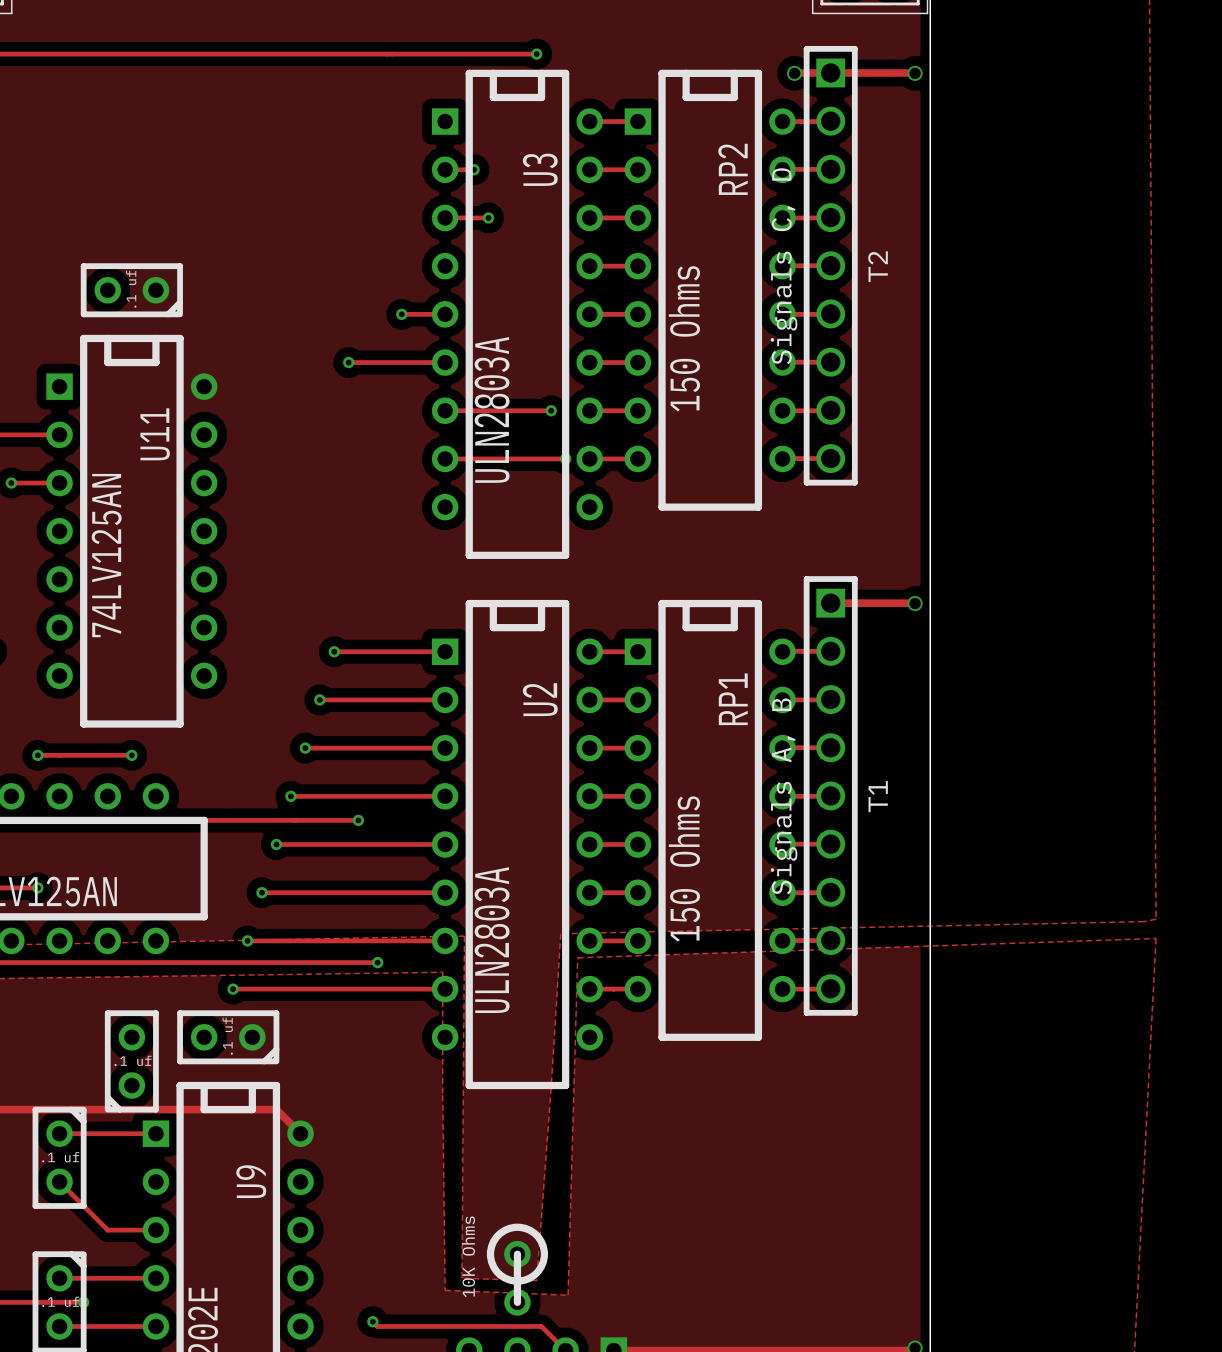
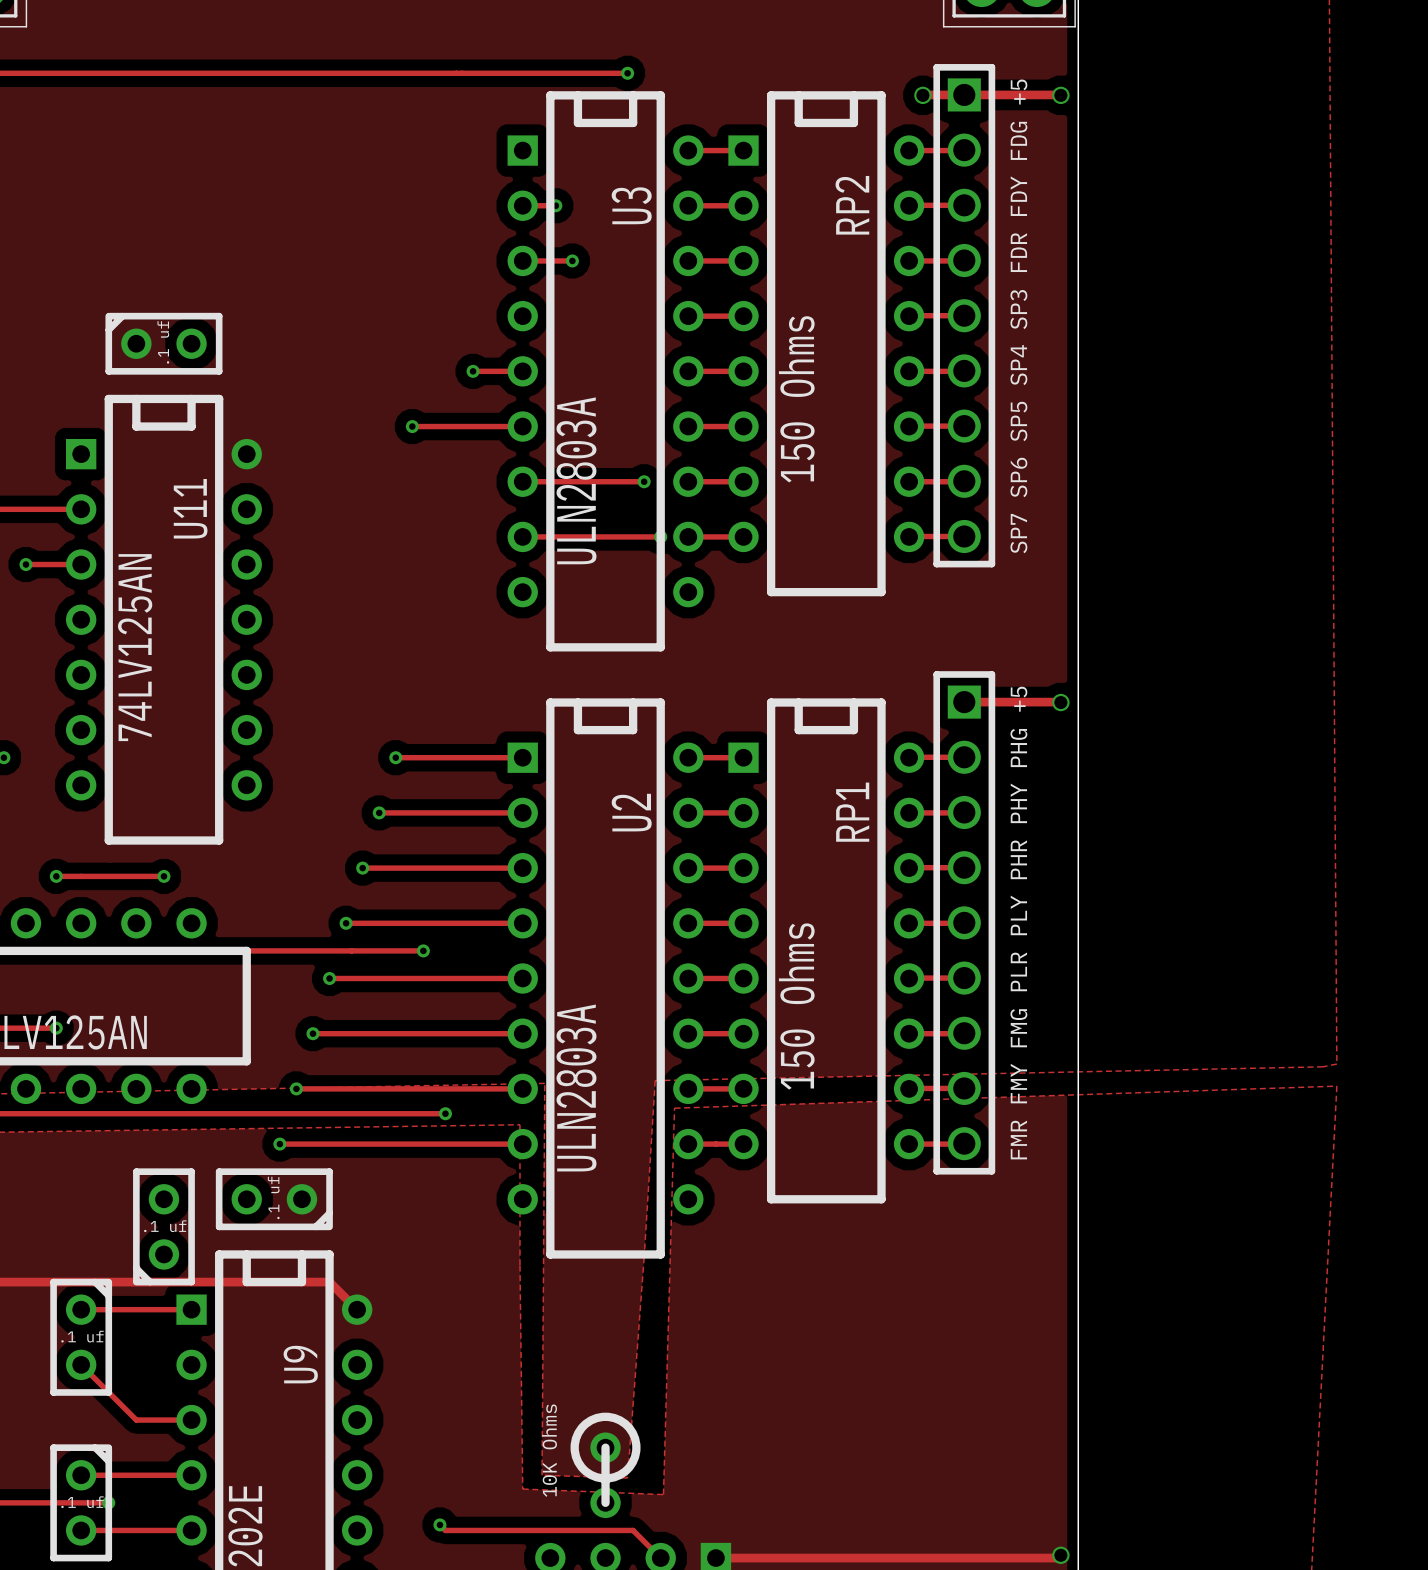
T2 value: Signals C, D (784, 266) -> SP7 SP6 SP5 SP4 SP3 FDR FDY FDG +5 (1018, 316)
T2 name: T2 (878, 266) -> none
part rotation: 0° (131, 290) -> 180° (163, 343)
T1 value: Signals A, B (784, 796) -> FMR FMY FMG PLR PLY PHR PHY PHG +5 (1018, 923)
T1 name: T1 (878, 796) -> none

